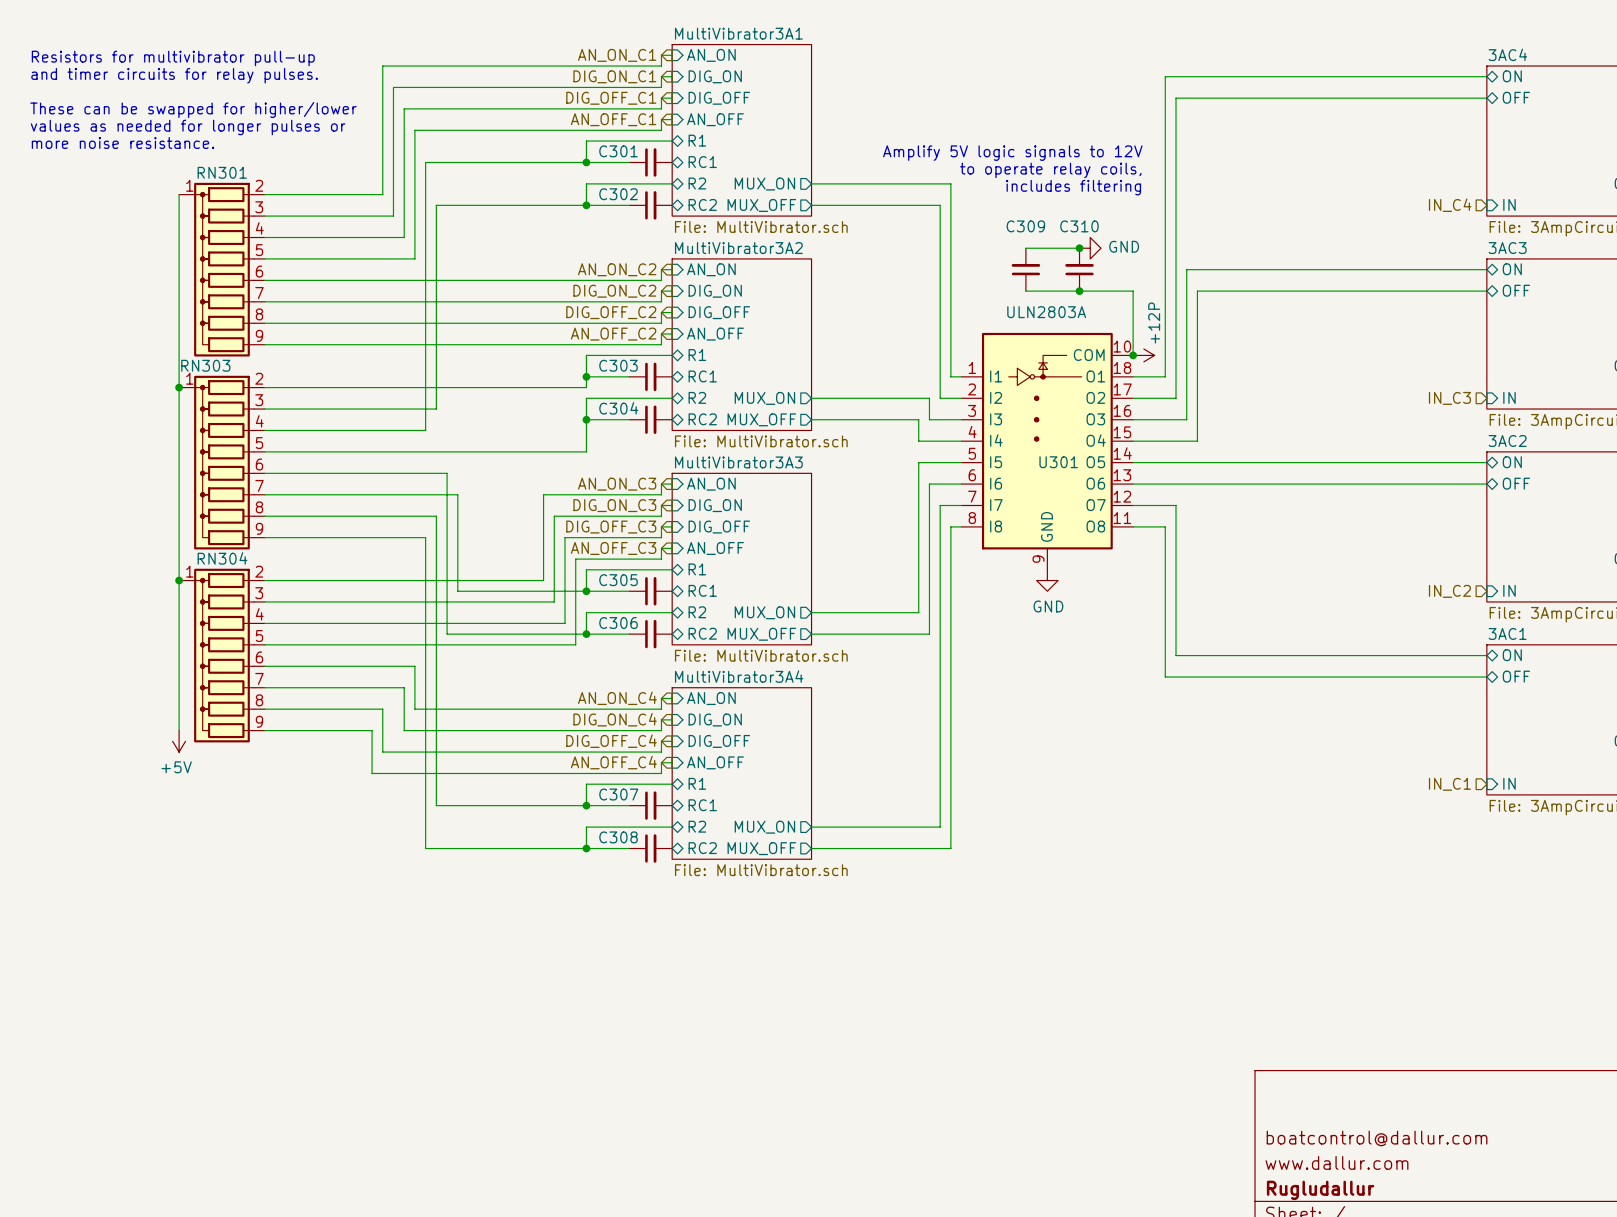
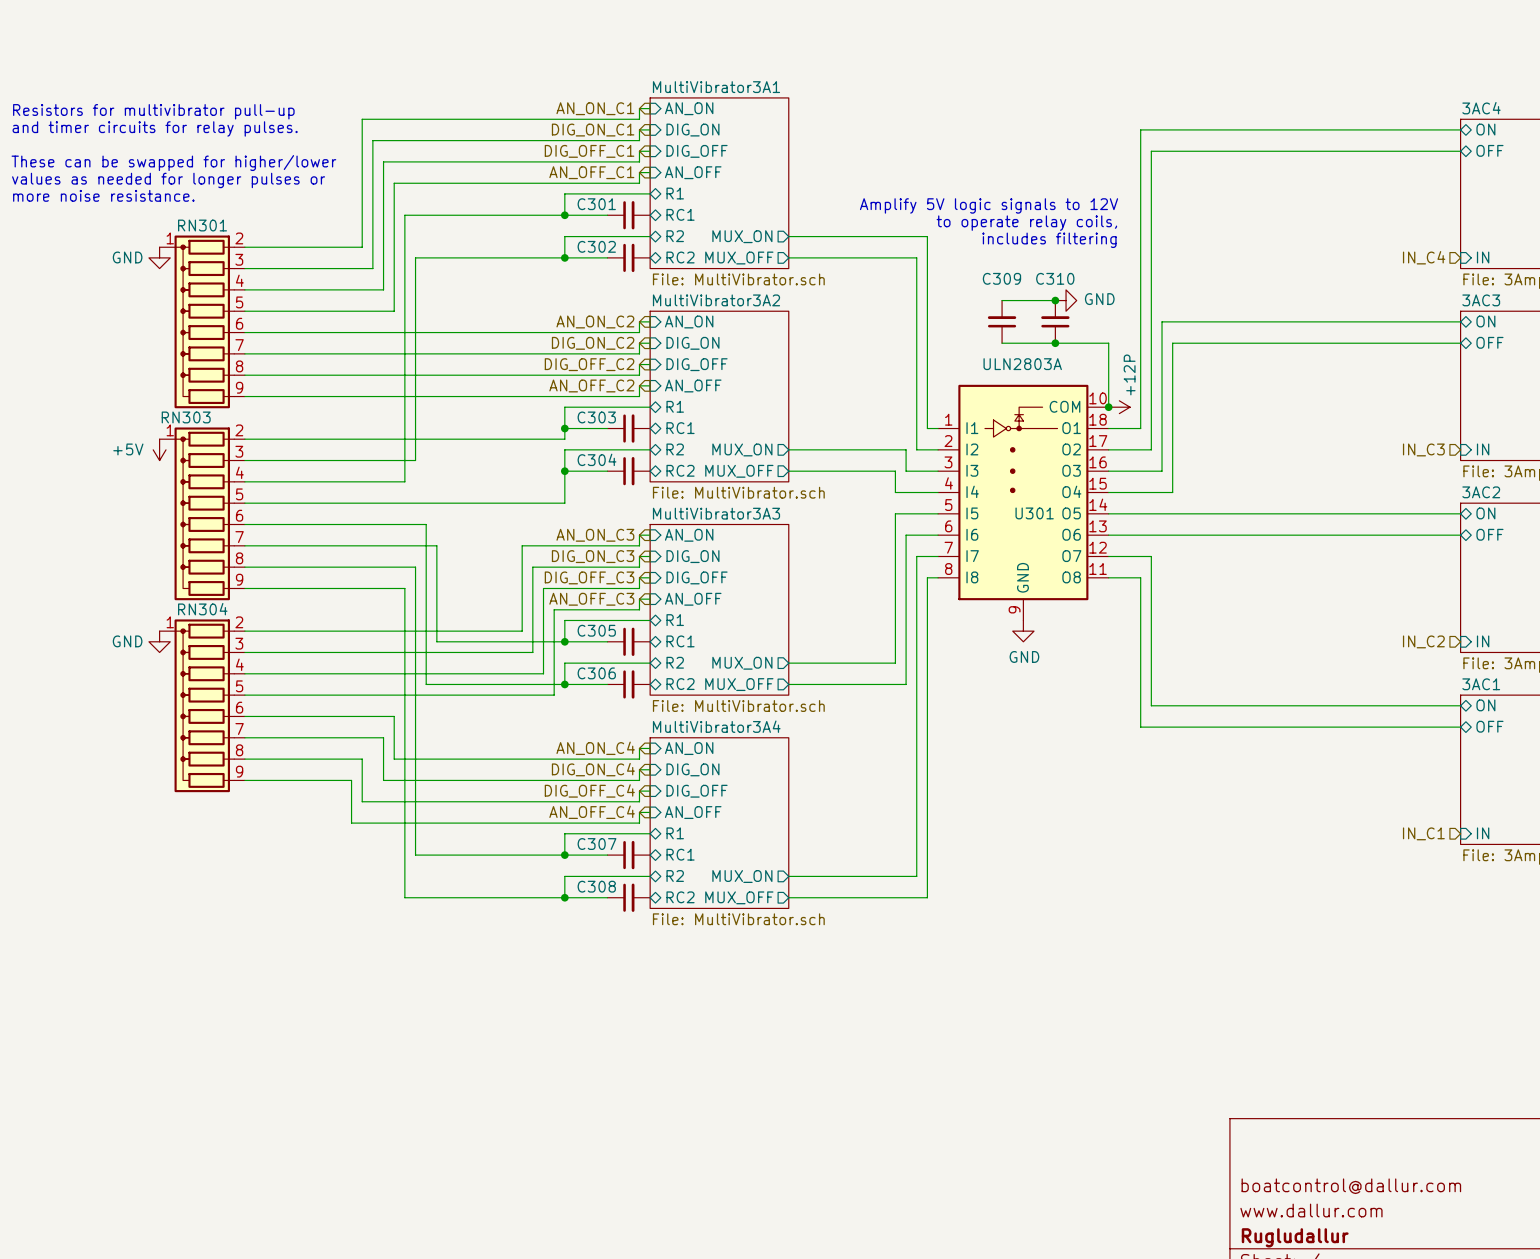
wire: (179, 194) (179, 730) -> none
power symbol: none -> GND (159, 257)
junction: (179, 387) -> none
power symbol: none -> +5V (159, 449)
junction: (179, 580) -> none
power symbol: none -> GND (159, 641)
power symbol: +5V (179, 741) -> none

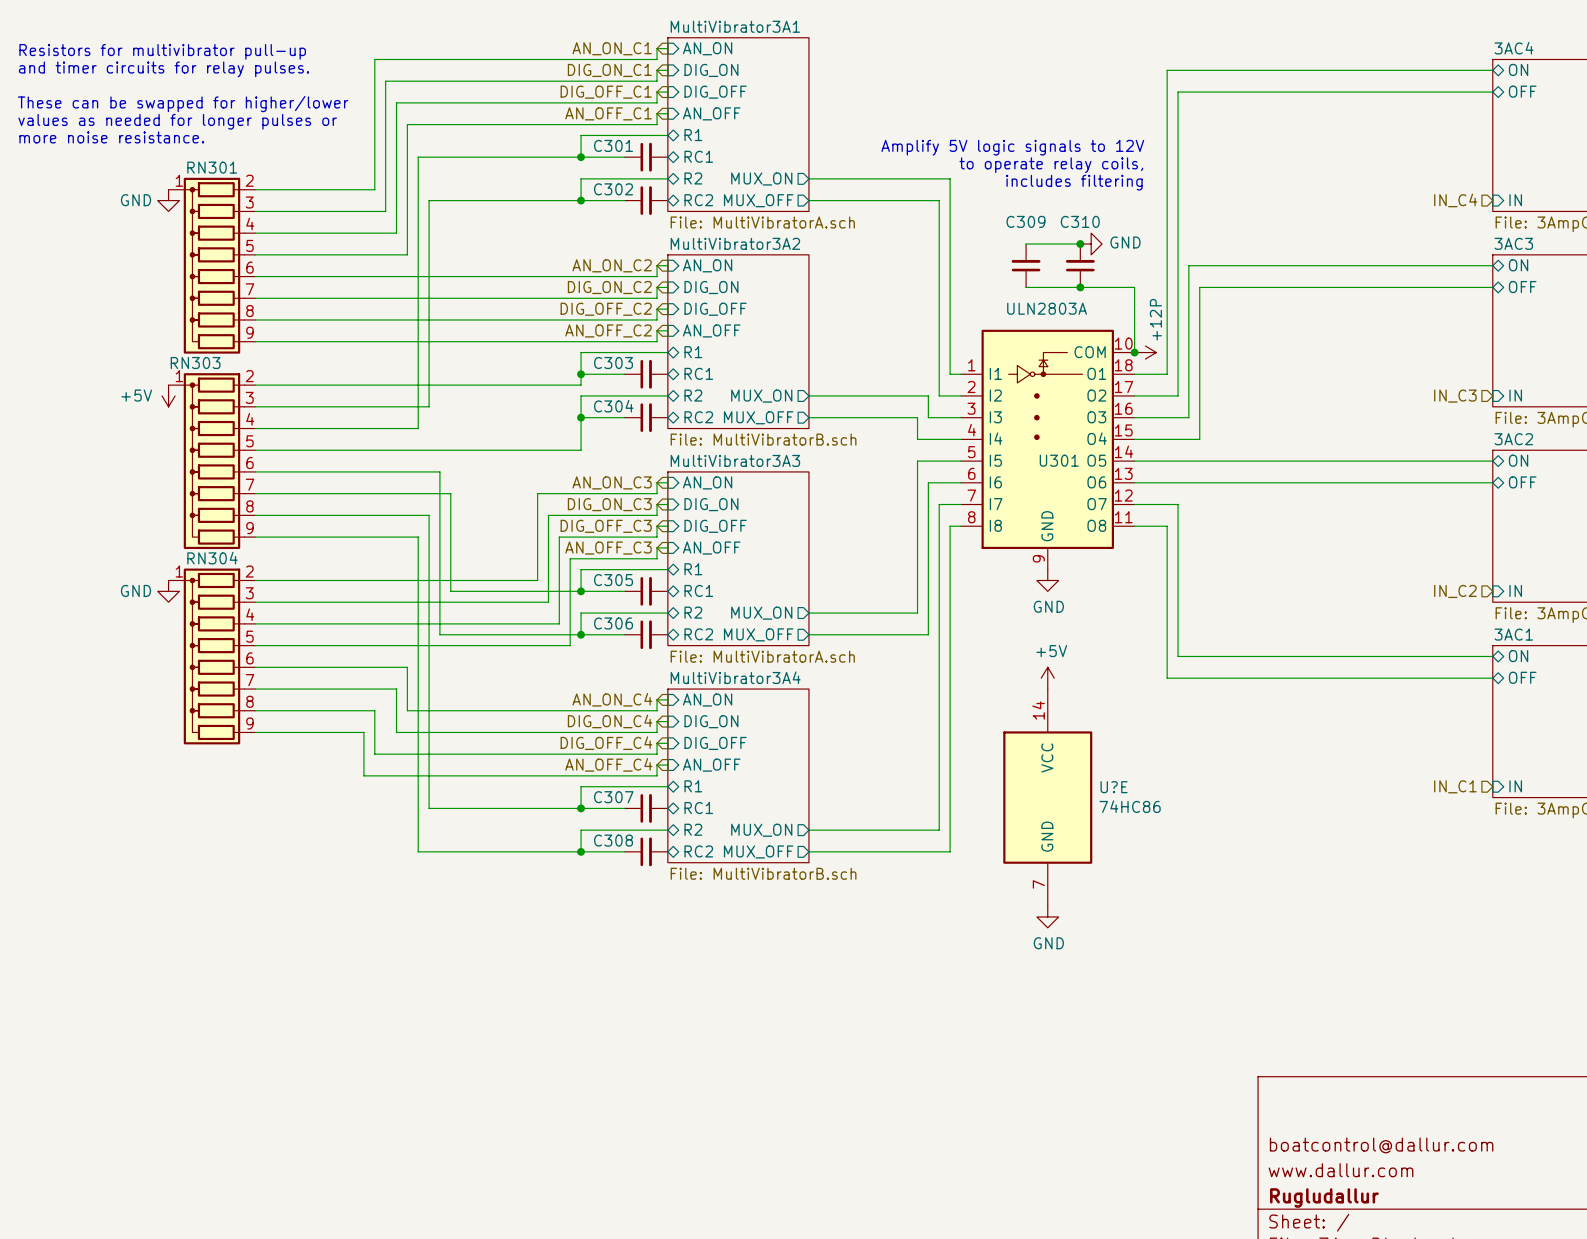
sheet MultiVibrator3A1 value: File: MultiVibrator.sch (738, 279) -> File: MultiVibratorA.sch (762, 222)
sheet MultiVibrator3A2 value: File: MultiVibrator.sch (738, 492) -> File: MultiVibratorB.sch (763, 439)
sheet MultiVibrator3A3 value: File: MultiVibrator.sch (738, 706) -> File: MultiVibratorA.sch (762, 656)
power symbol: none -> +5V (1047, 678)
U?E: none -> 74HC86 (1047, 797)
sheet MultiVibrator3A4 value: File: MultiVibrator.sch (738, 919) -> File: MultiVibratorB.sch (763, 873)
power symbol: none -> GND (1047, 916)

